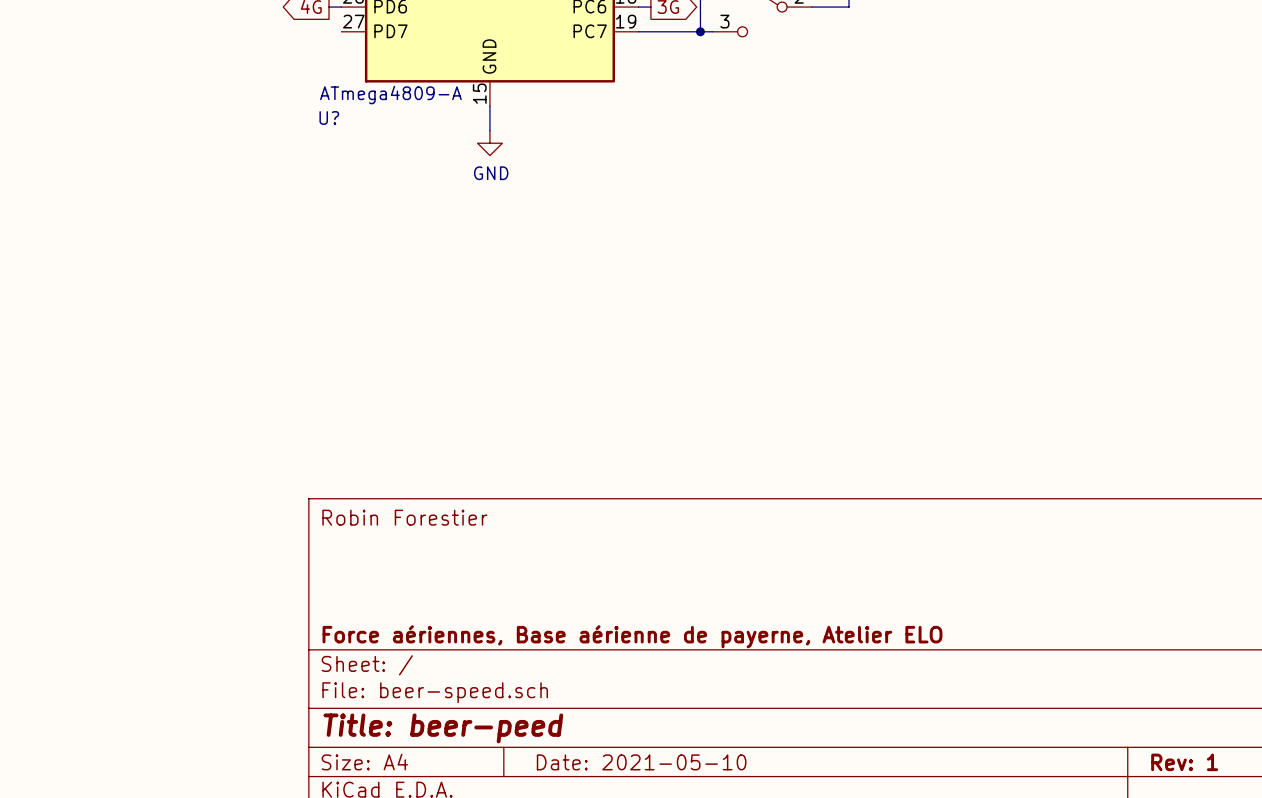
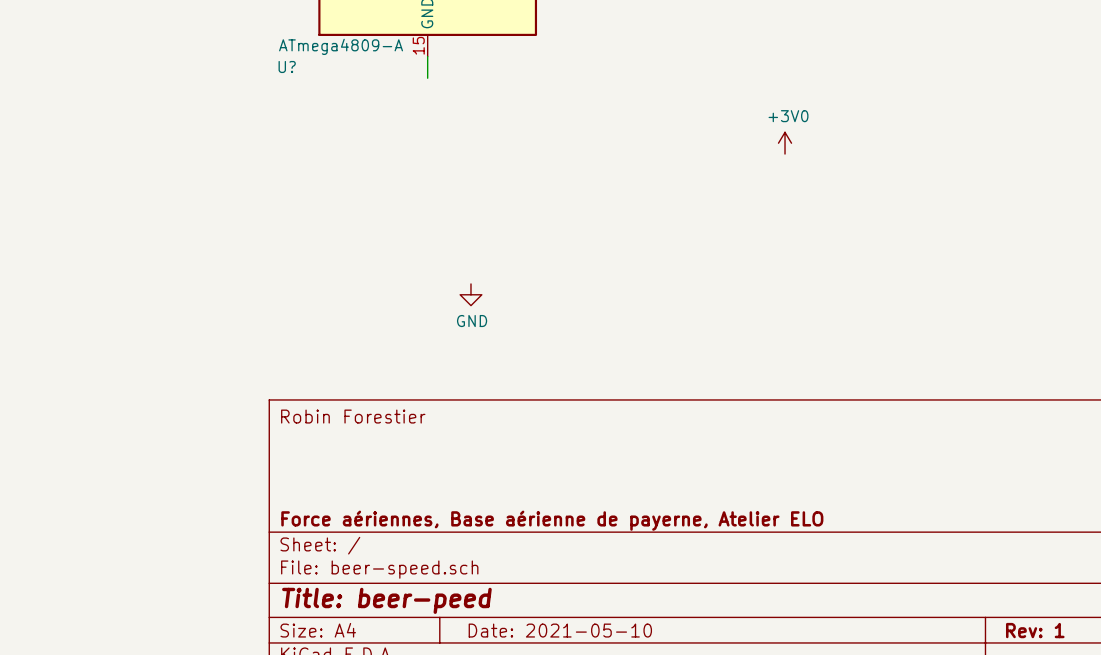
power symbol: GND (489, 143) -> none
power symbol: none -> +3V0 (785, 143)
power symbol: none -> GND (470, 294)

